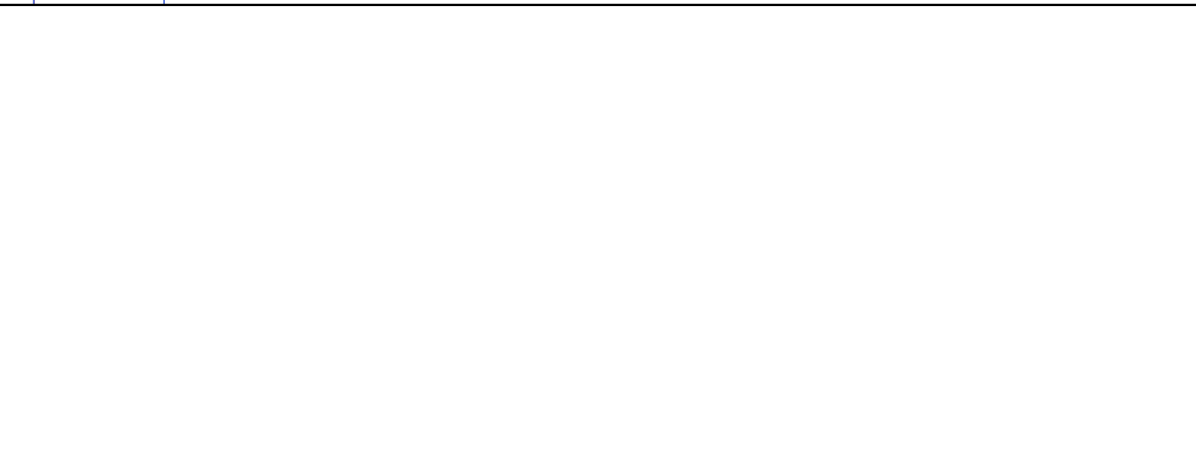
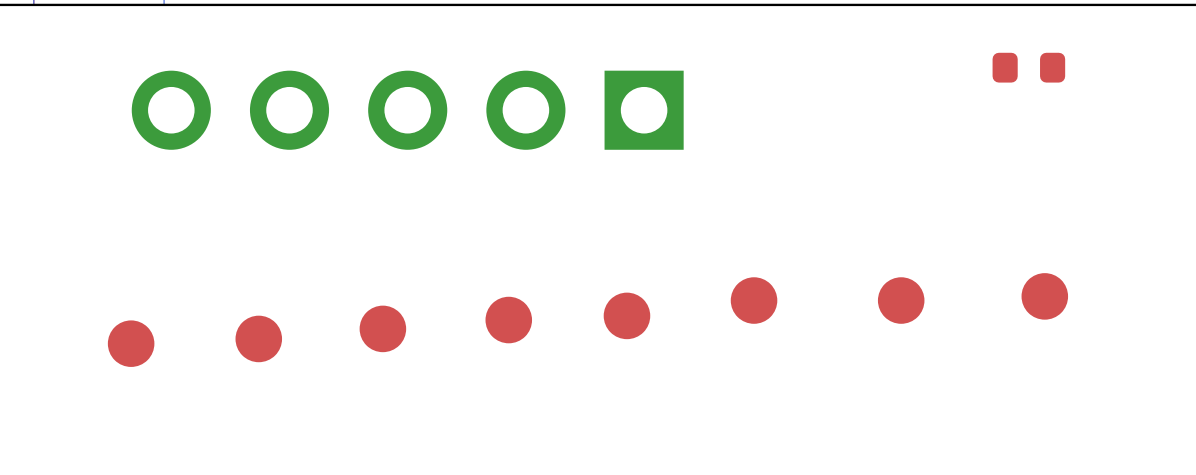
part: none -> (1028, 67)
part: none -> (407, 110)
part: none -> (1044, 296)
part: none -> (754, 300)
part: none -> (901, 300)
part: none -> (626, 315)
part: none -> (508, 320)
part: none -> (382, 328)
part: none -> (258, 338)
part: none -> (131, 343)

